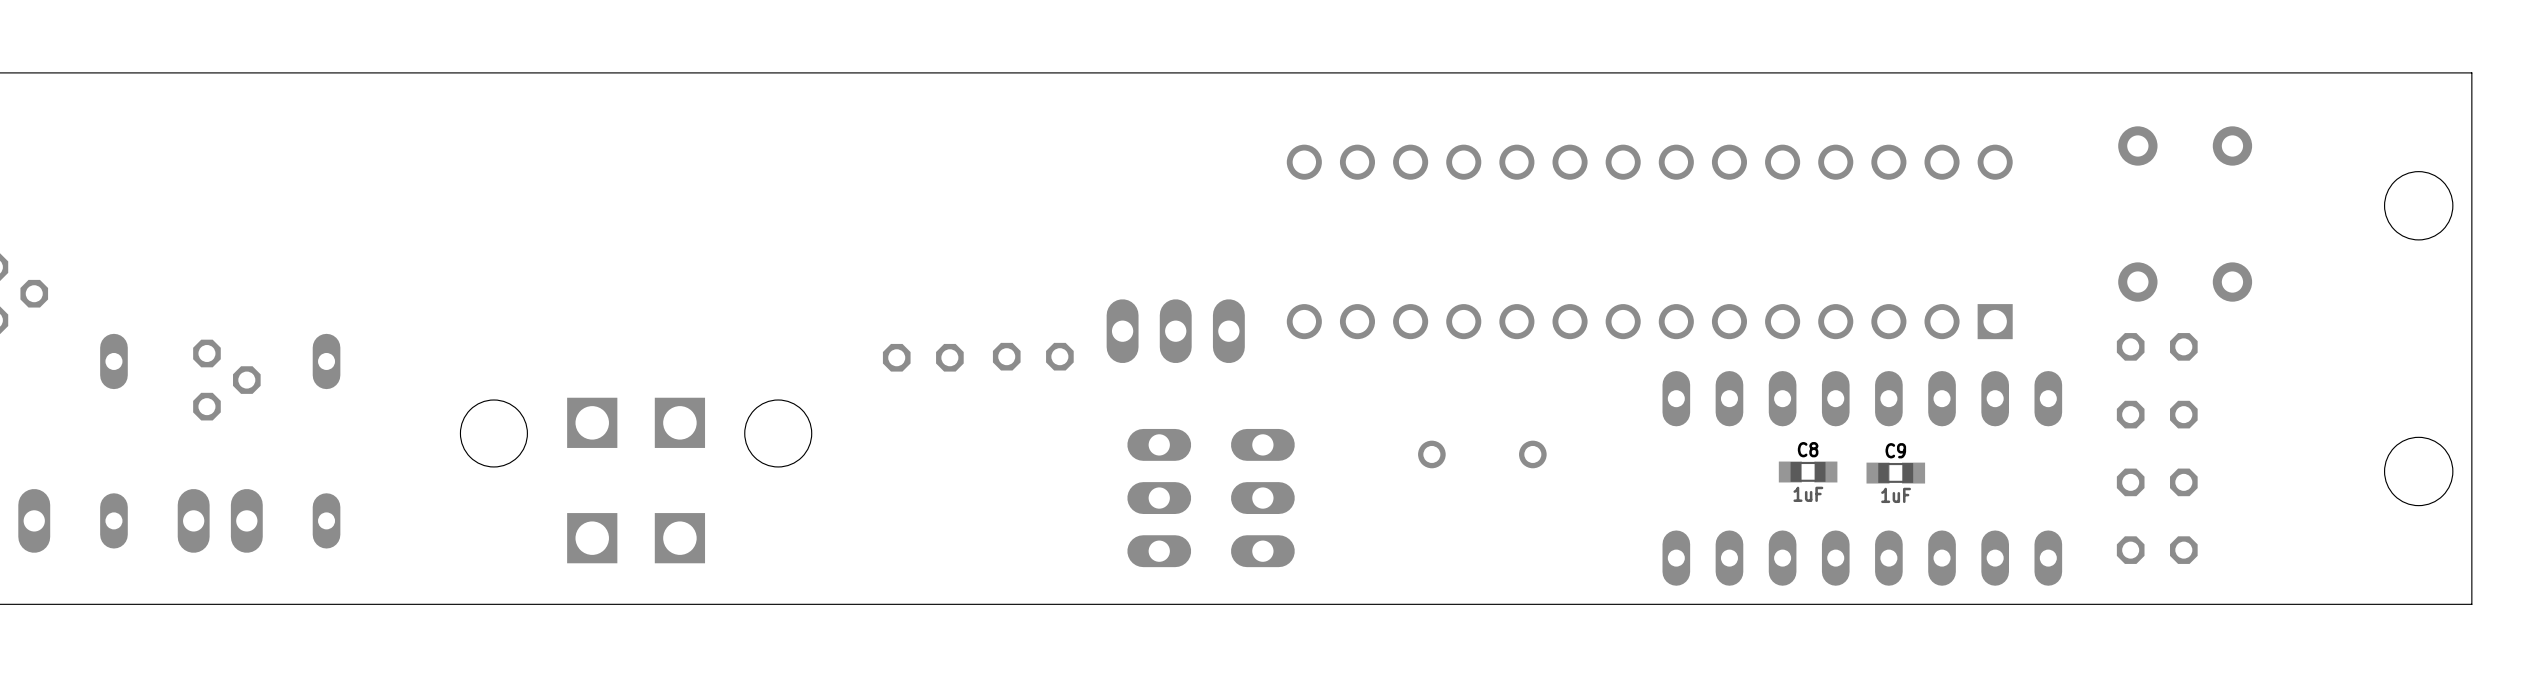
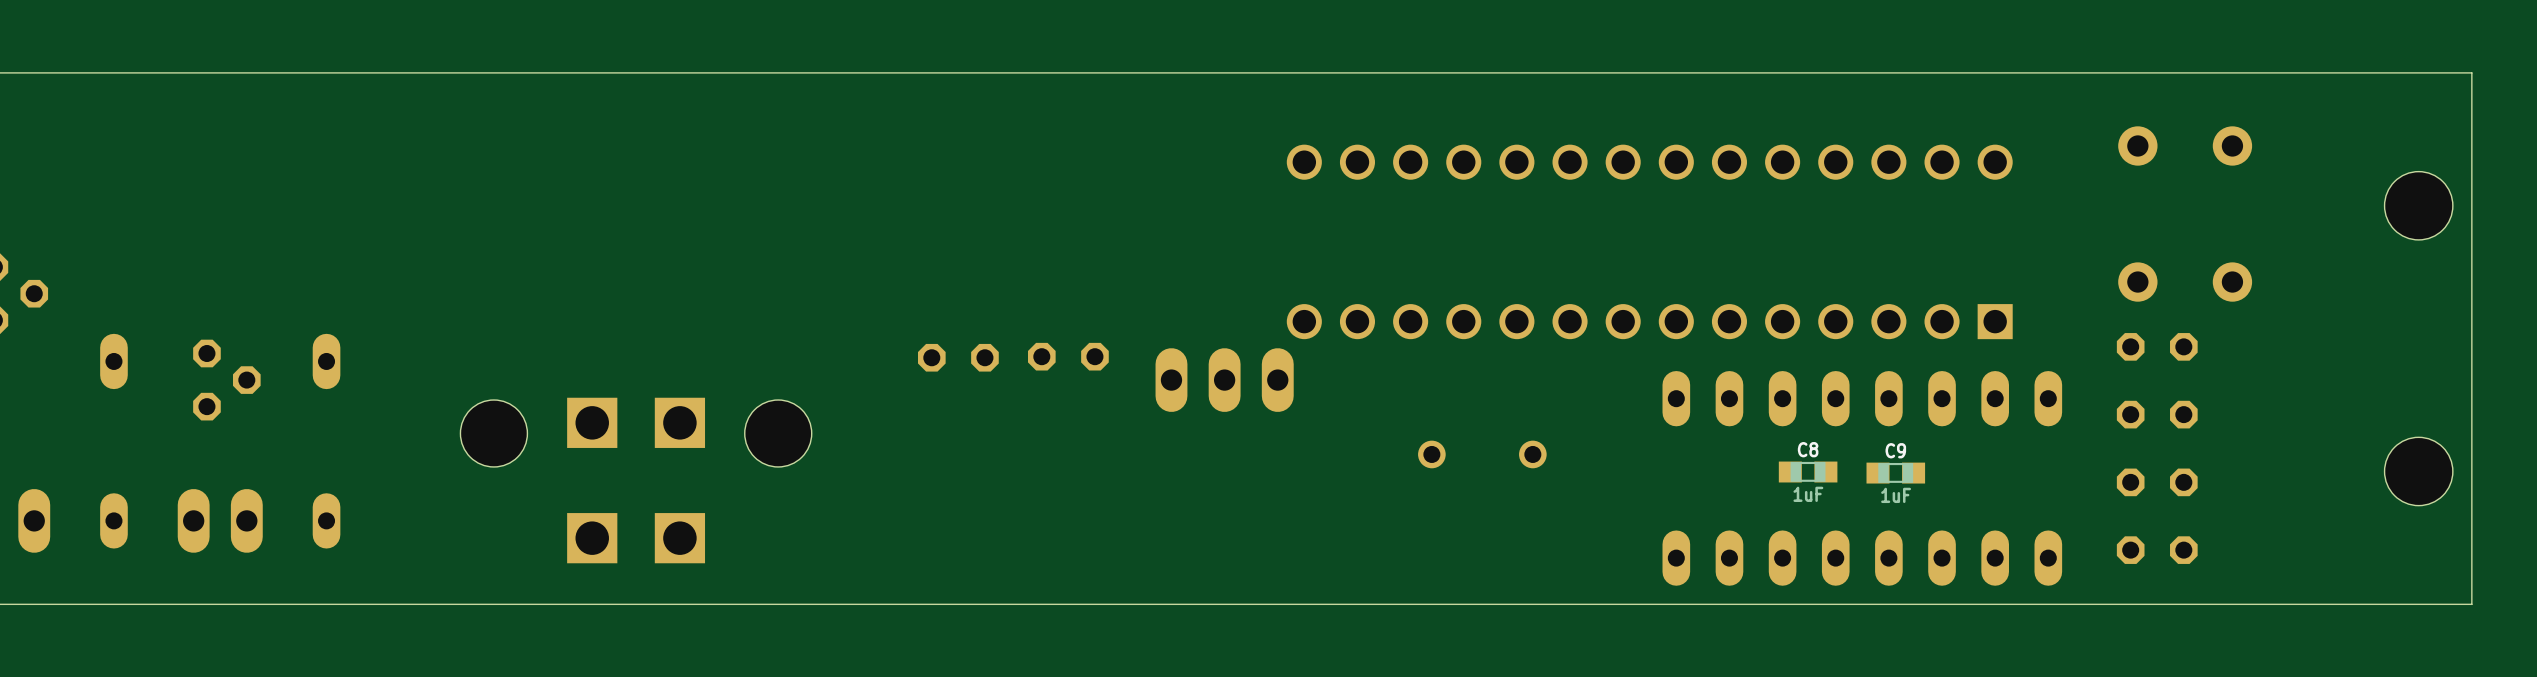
part: (1175, 331) -> none
part position: (1033, 356) -> (1068, 356)
part position: (923, 357) -> (958, 357)
part: none -> (1224, 380)
part: (1159, 498) -> none
part: (1262, 498) -> none

